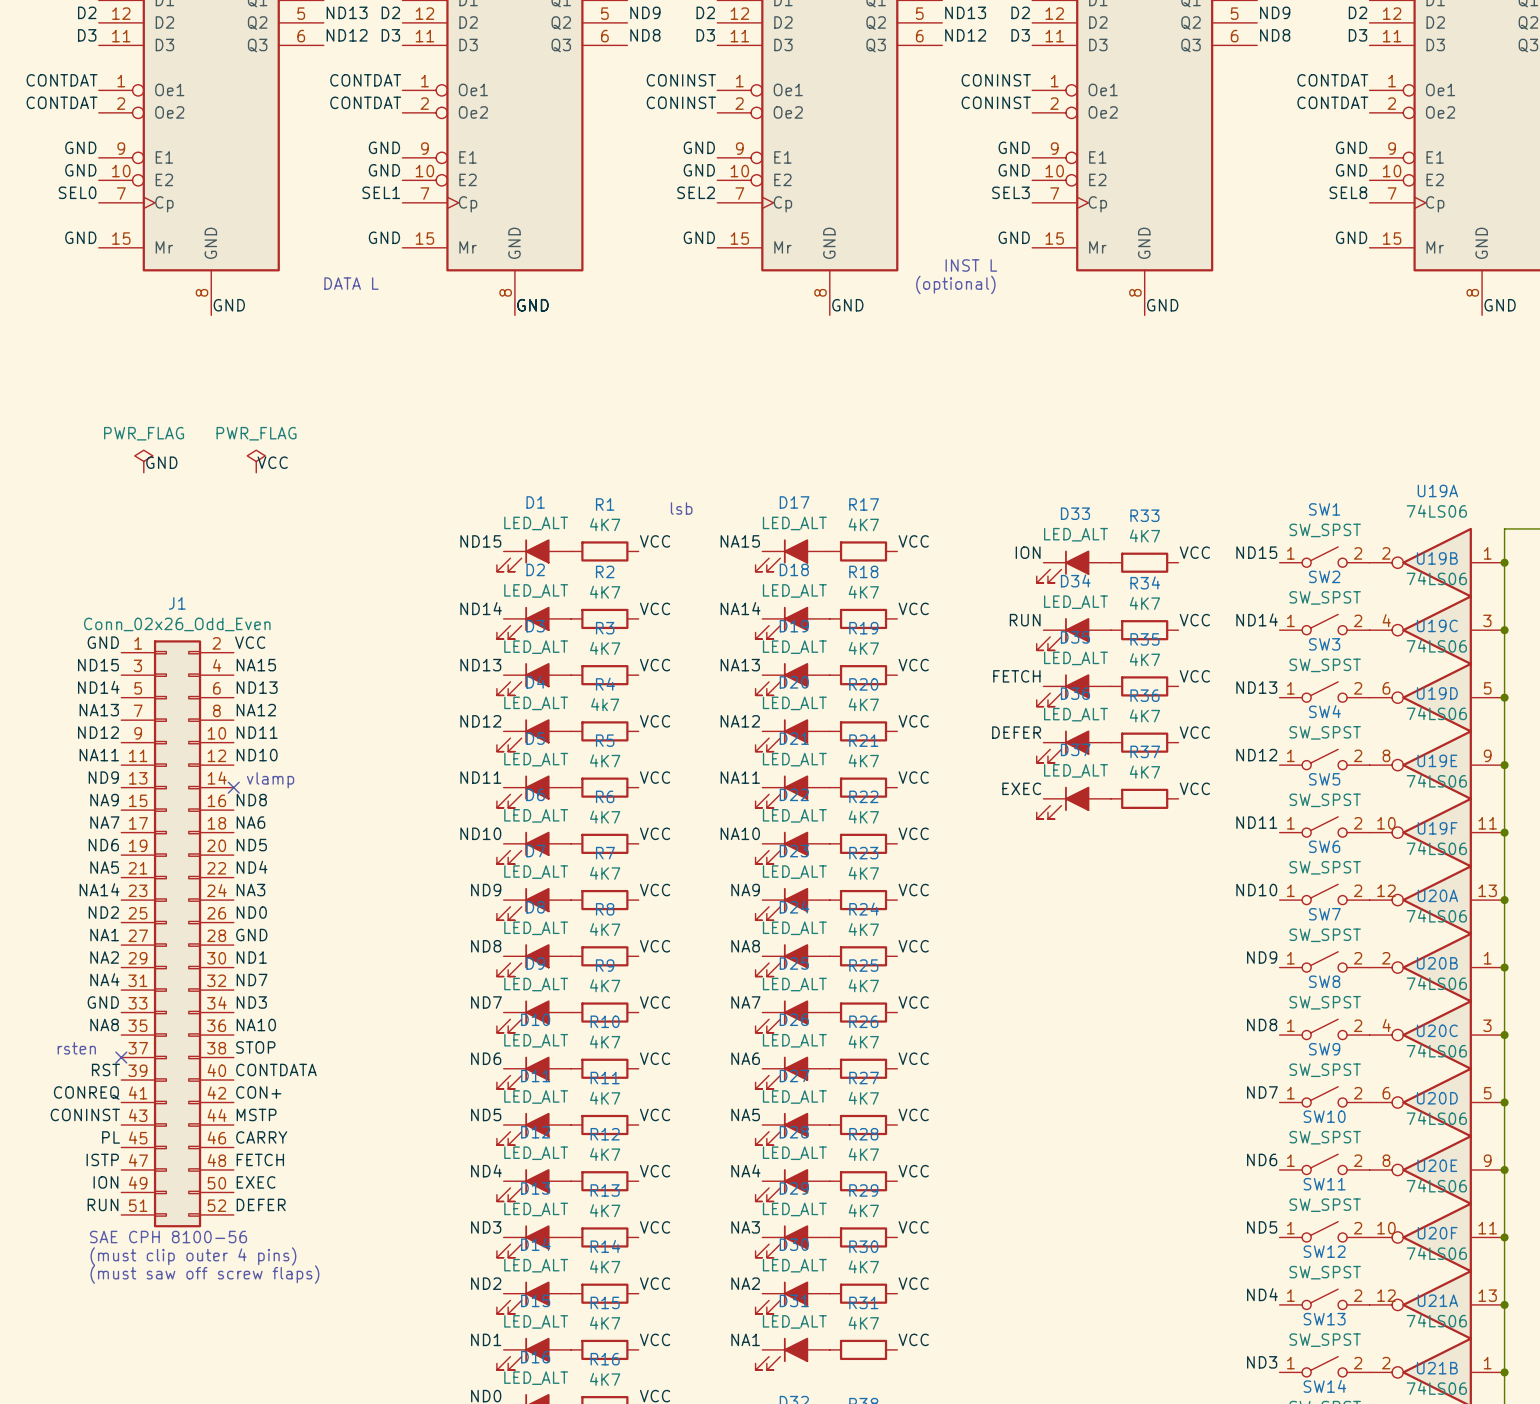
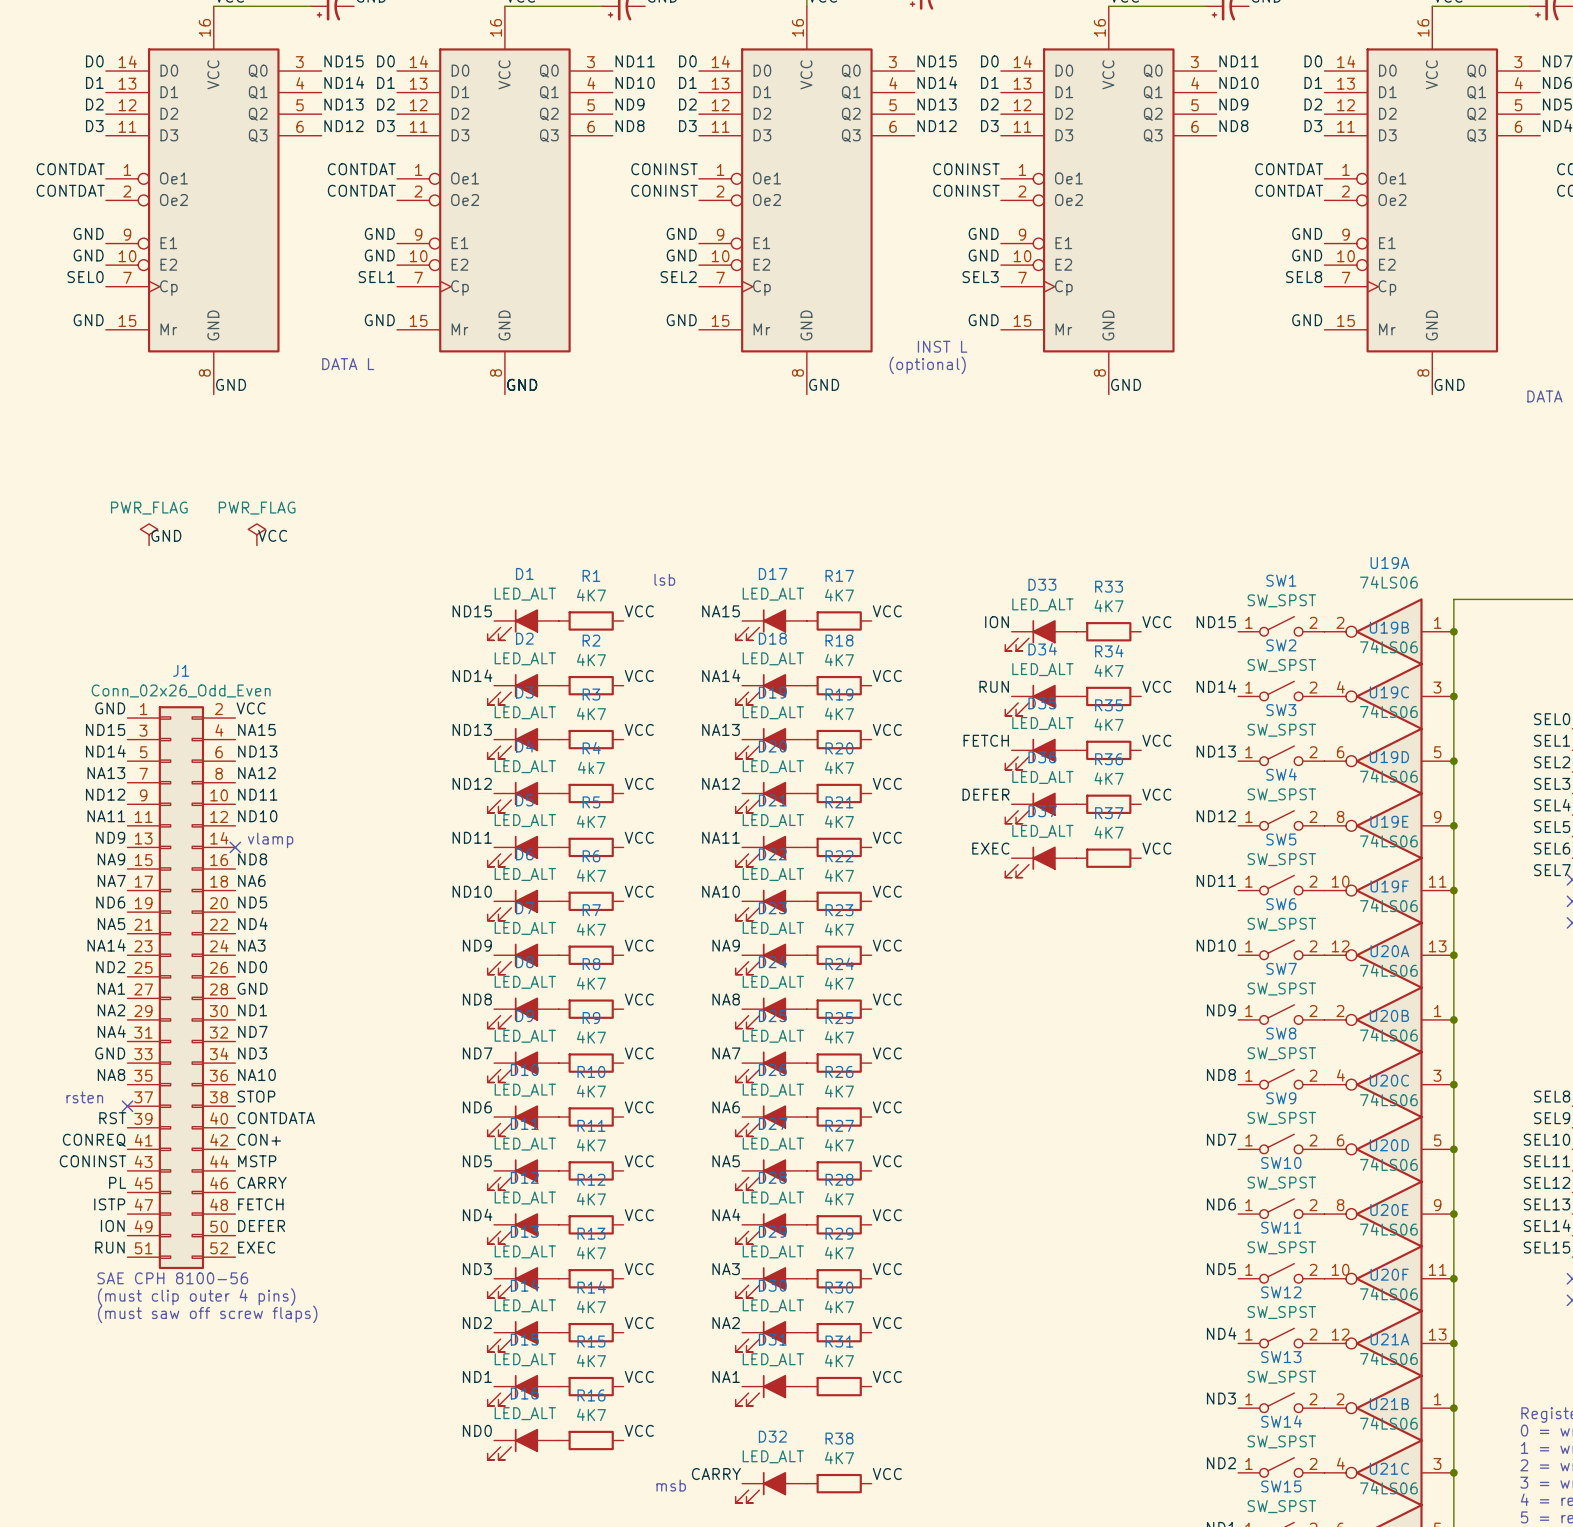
label: EXEC (256, 1182) -> DEFER (261, 1226)
label: DEFER (261, 1204) -> EXEC (256, 1247)

